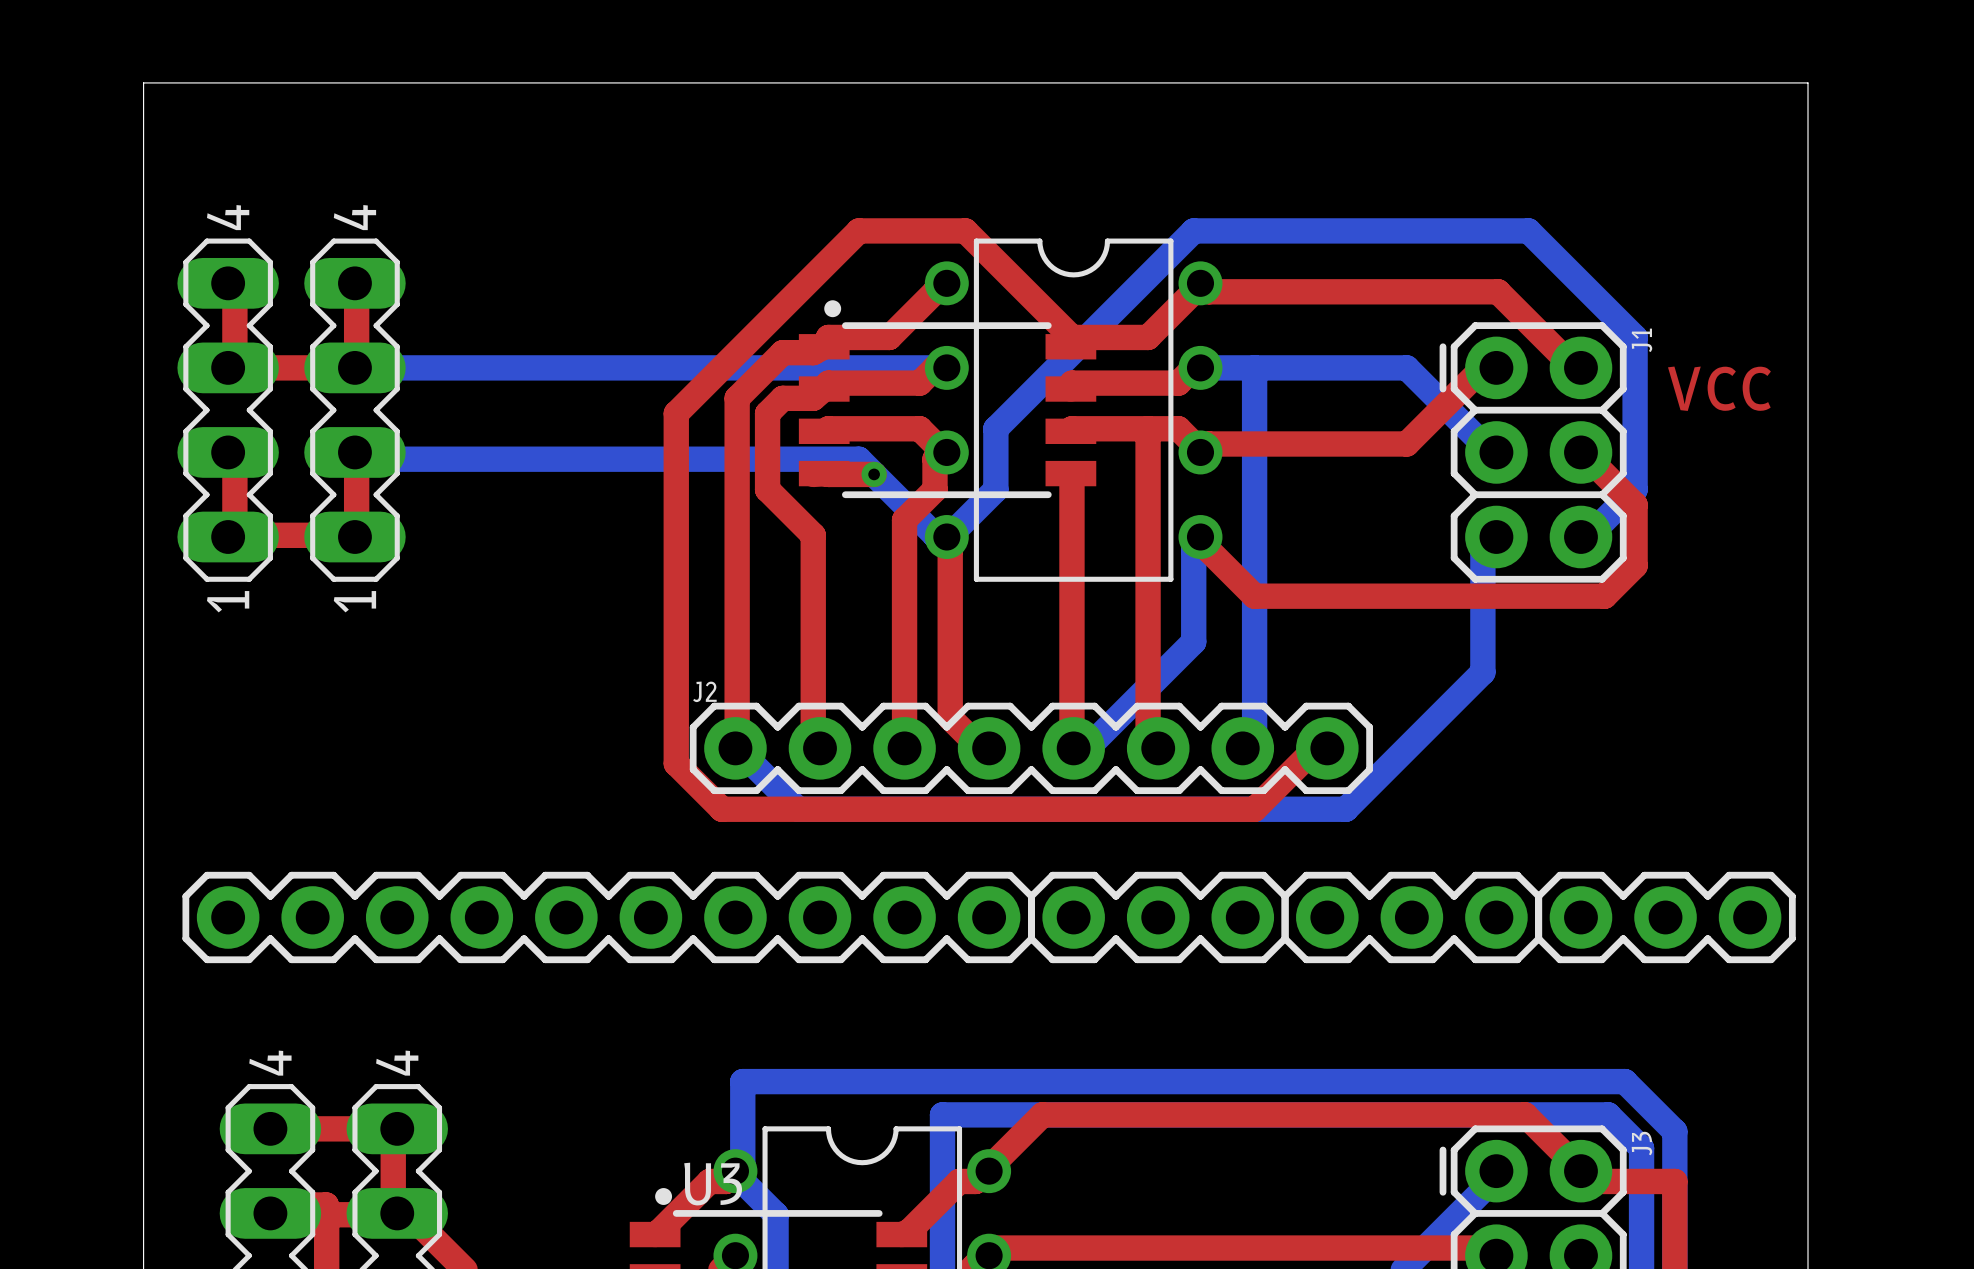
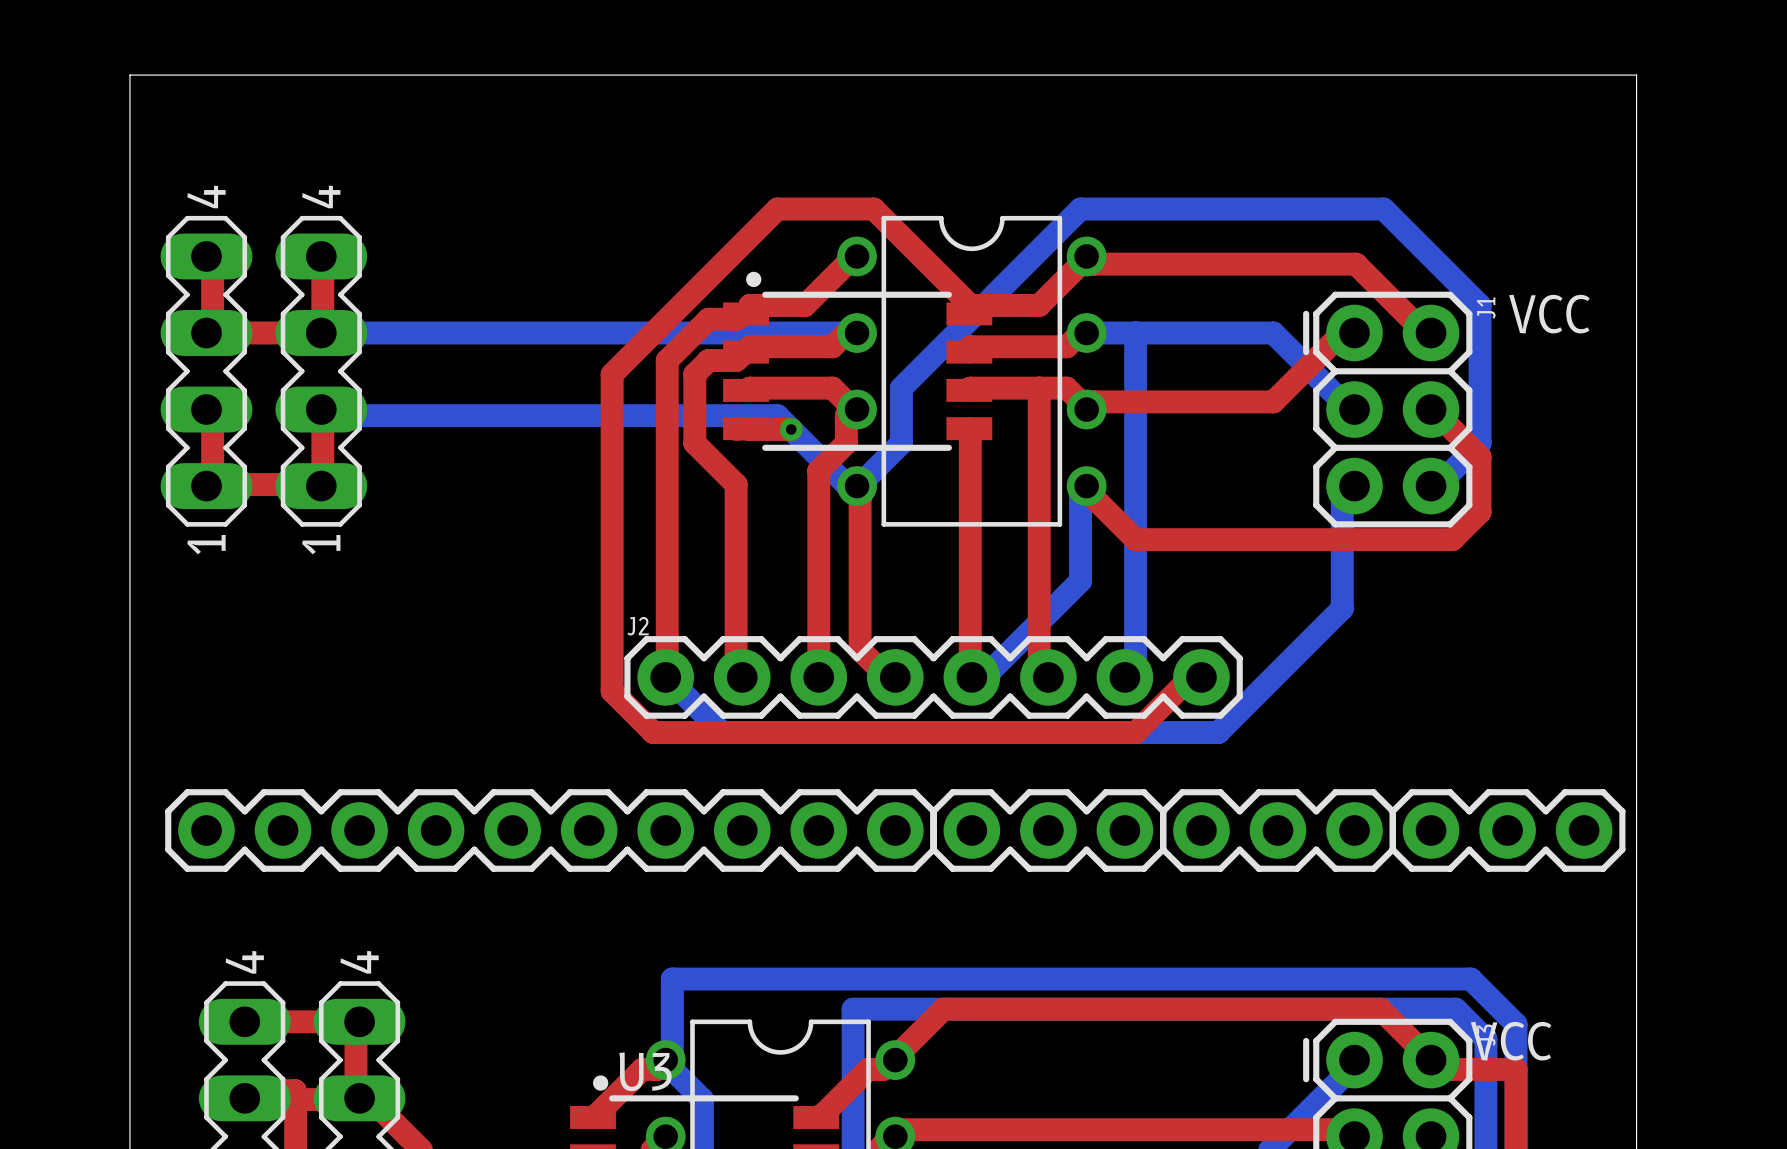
text: none -> VCC (1549, 314)
text: vcc (1719, 388) -> none
text: none -> VCC (1511, 1041)

